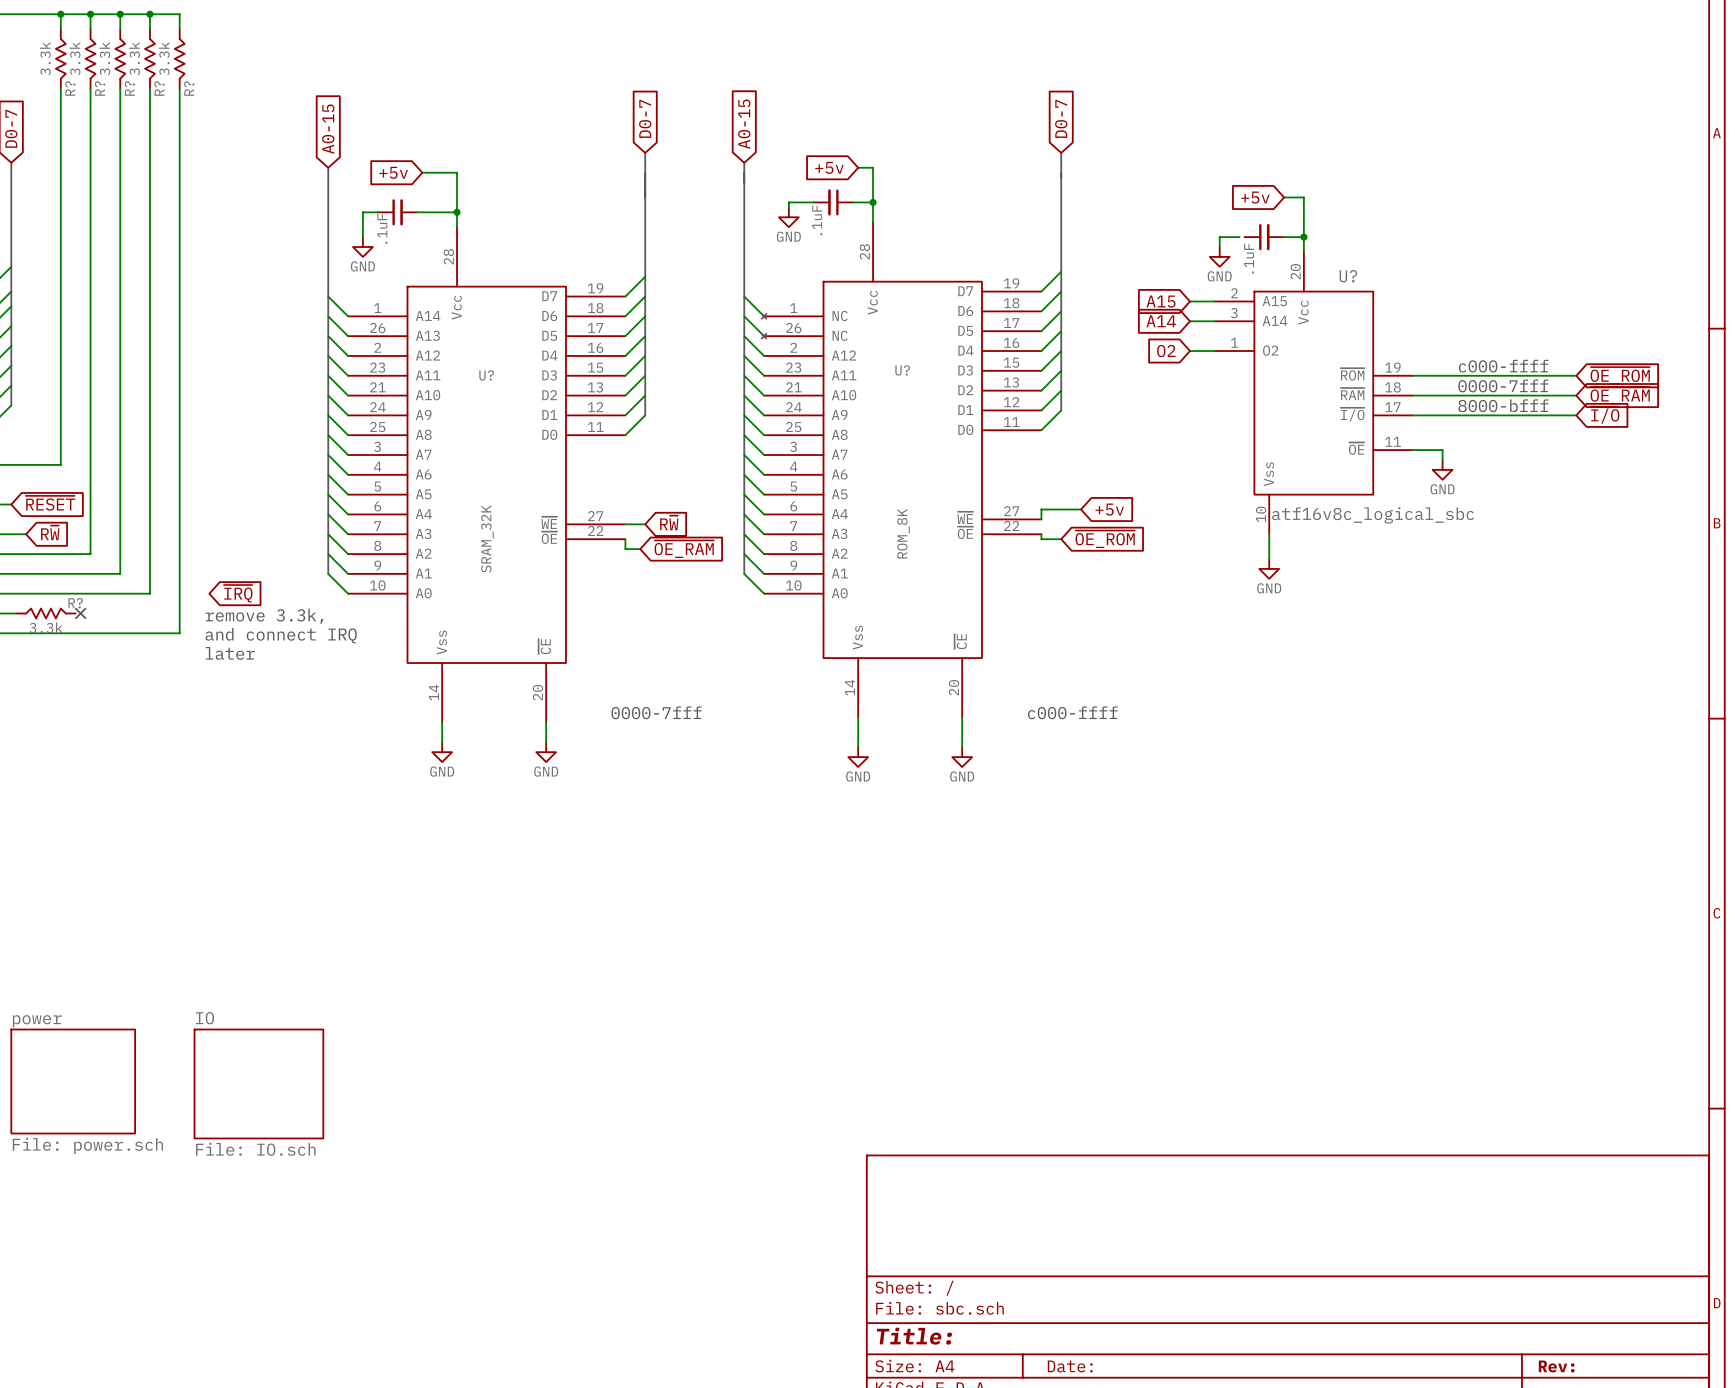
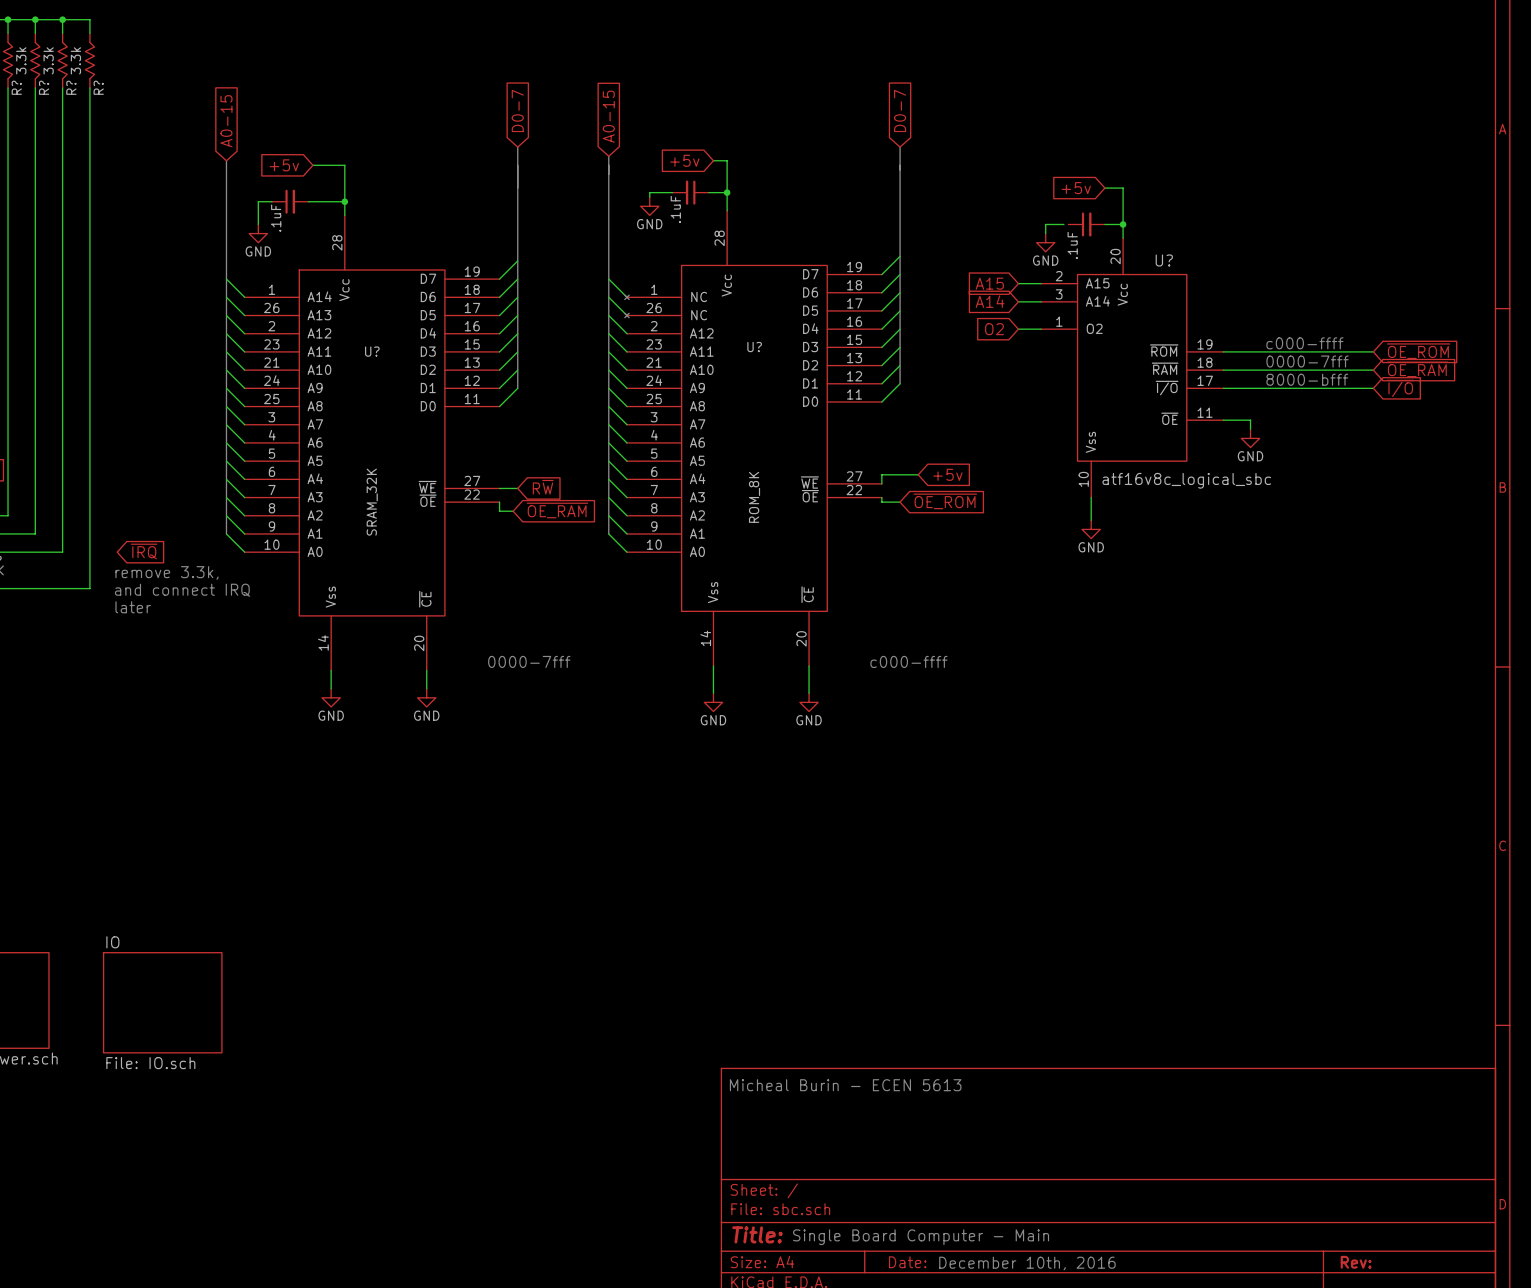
text: none -> Micheal Burin - ECEN 5613 (845, 1085)
text: none -> Single Board Computer - Main (921, 1237)
text: none -> December 10th, 2016 (1027, 1263)

